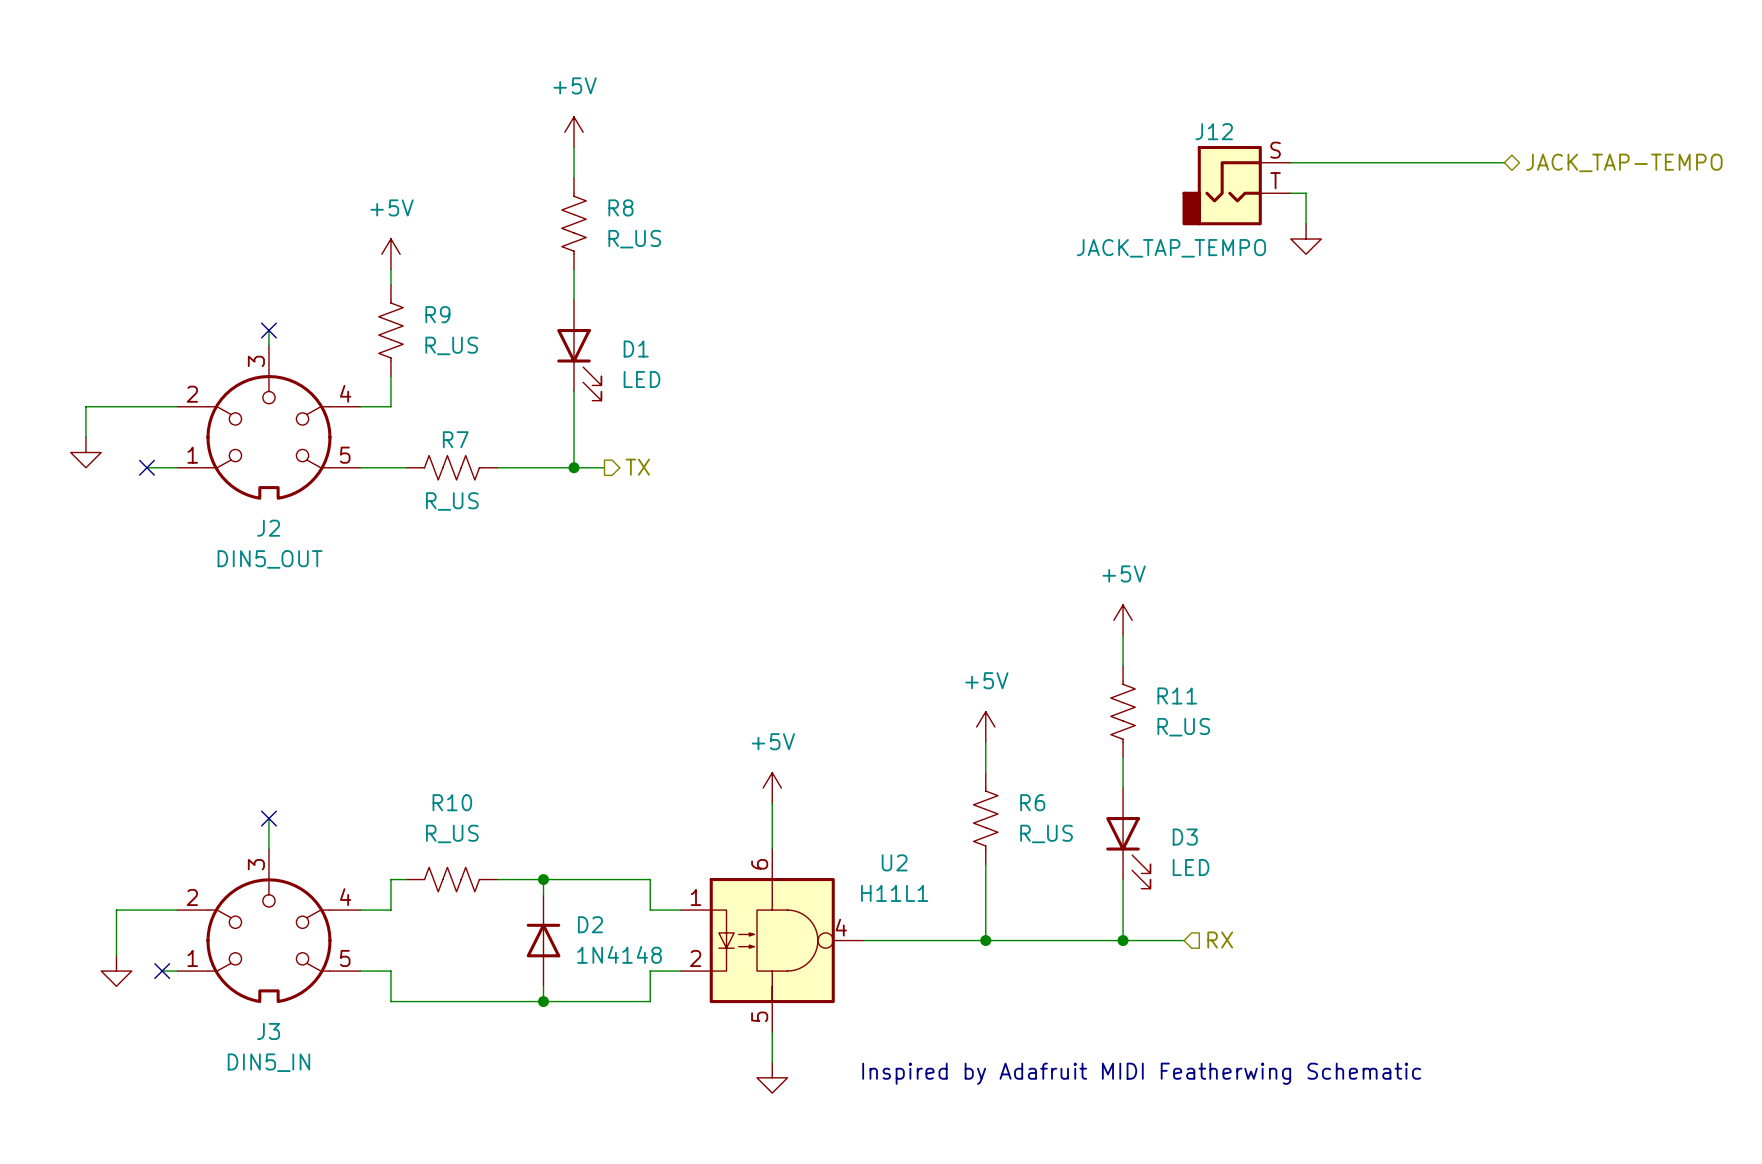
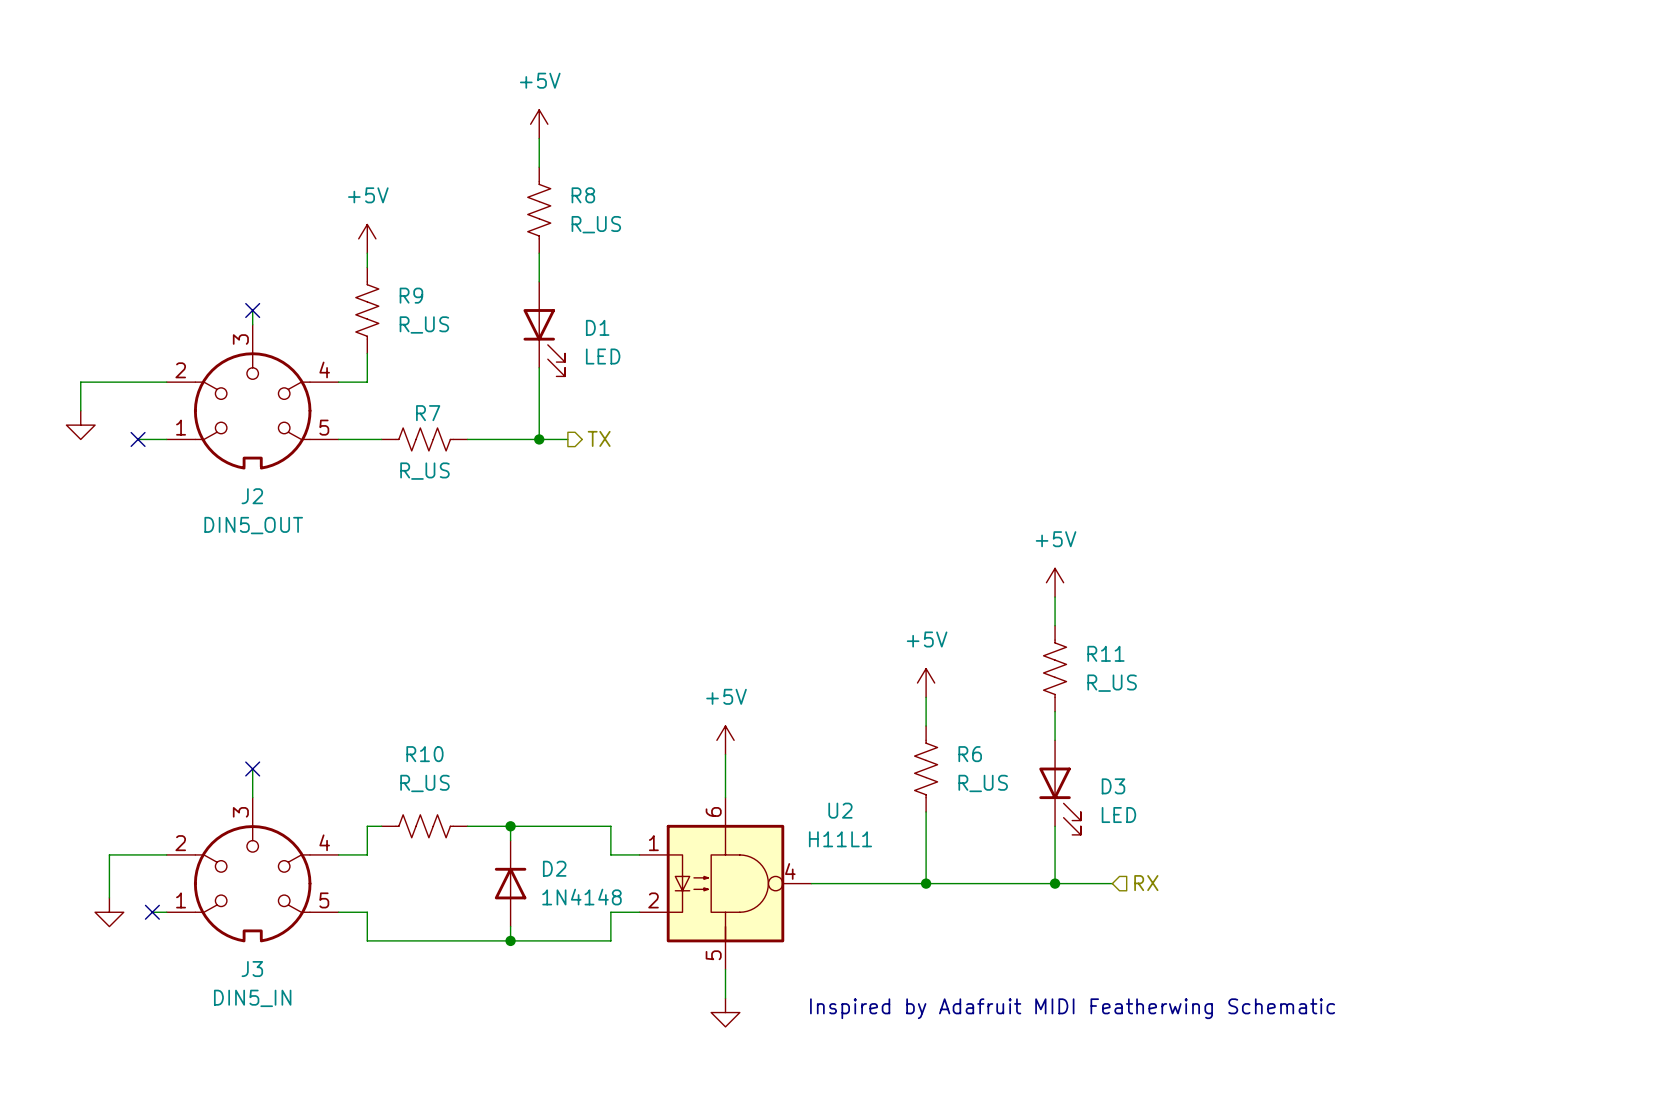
wire: (1290, 162) (1504, 162) -> none
hierarchical label: JACK_TAP-TEMPO (1624, 162) -> none
J12: JACK_TAP_TEMPO (1236, 185) -> none
wire: (1290, 193) (1306, 193) (1306, 223) -> none
power symbol: (1306, 239) -> none

